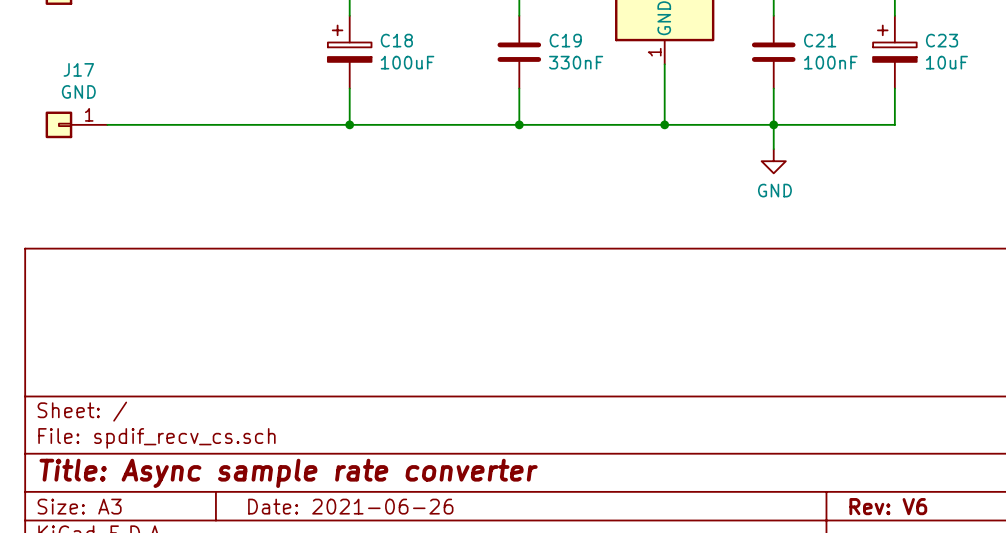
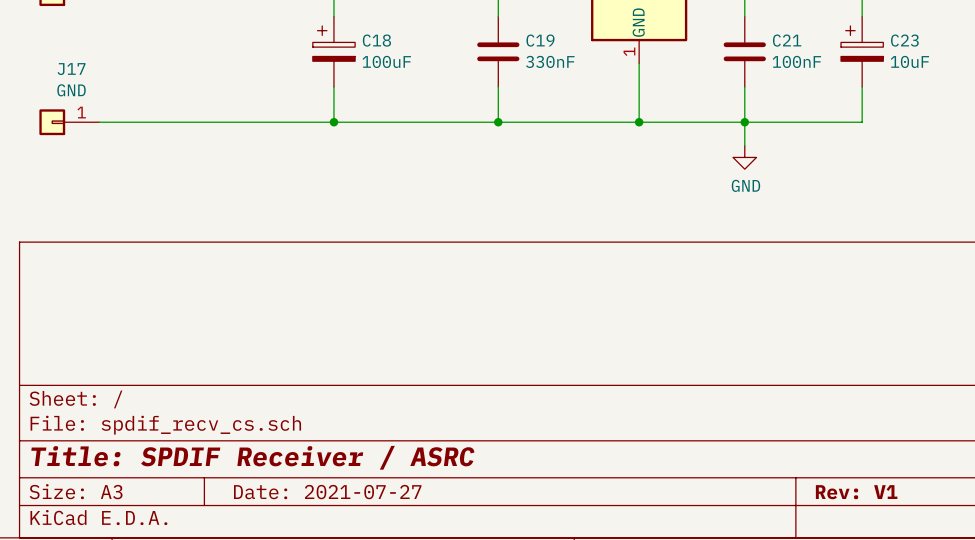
title block: Title: Async sample rate converter (288, 473) -> Title: SPDIF Receiver / ASRC (252, 457)
title block: Date: 2021-06-26 (350, 506) -> Date: 2021-07-27 (327, 492)
title block: Rev: V6 (888, 506) -> Rev: V1 (856, 492)

